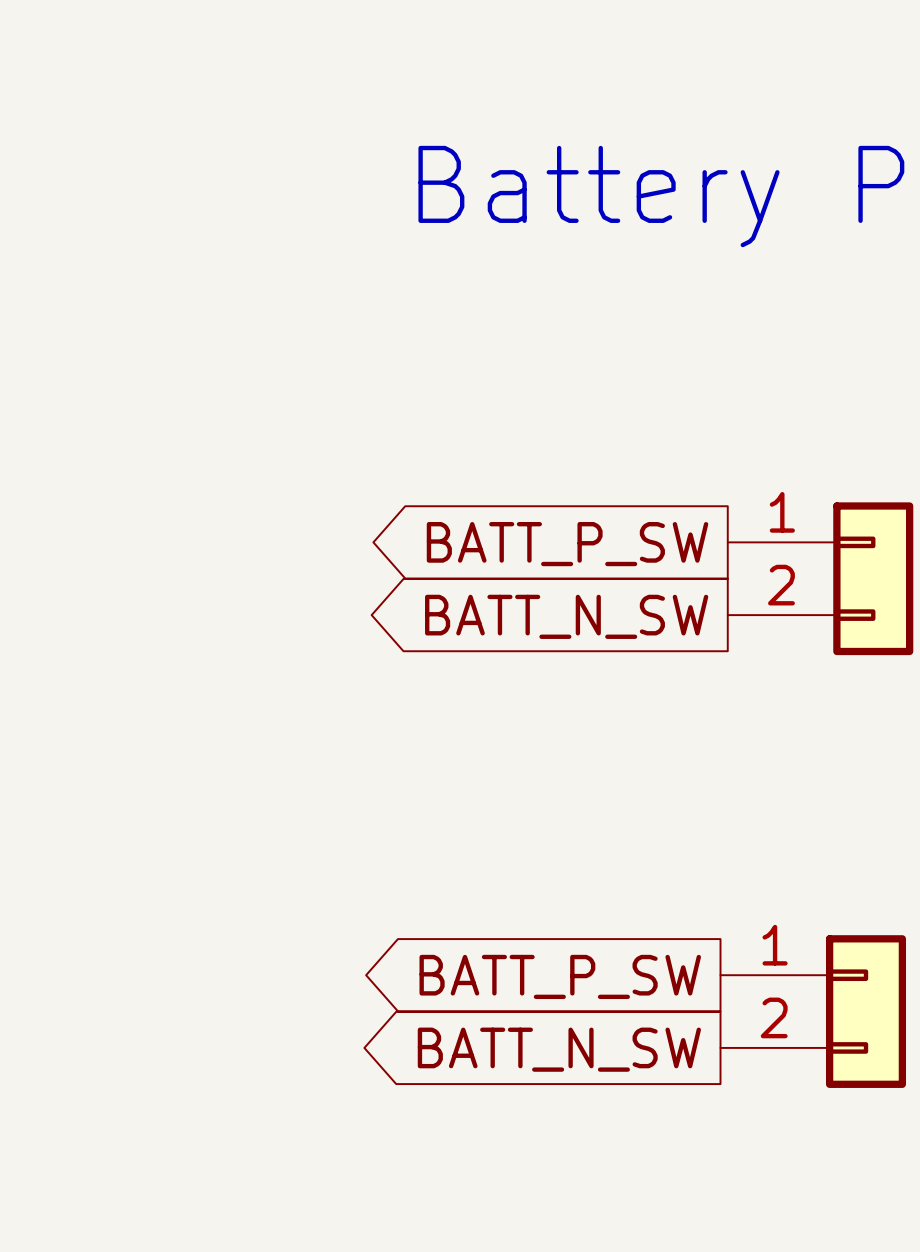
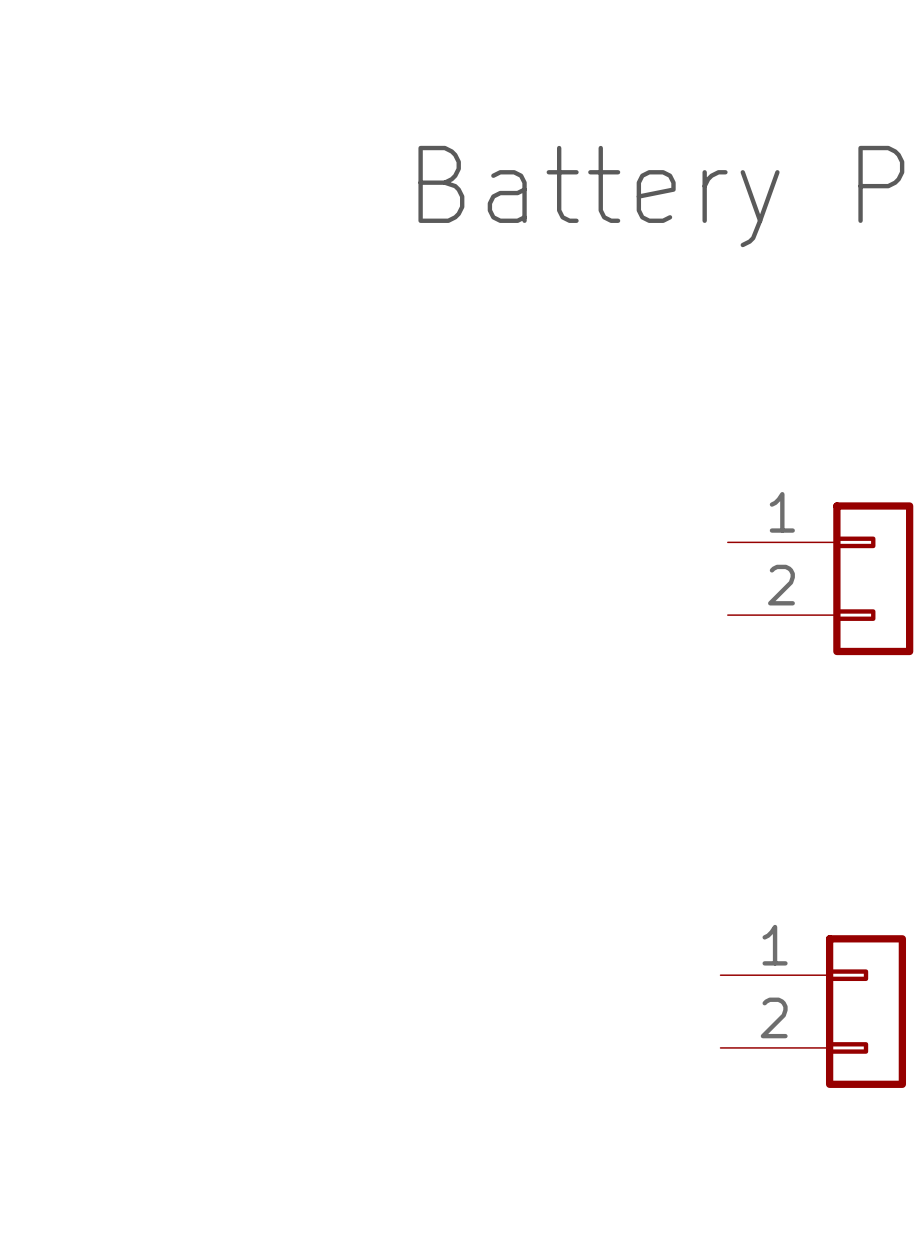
global label: BATT_P_SW (567, 544) -> none
global label: BATT_N_SW (566, 616) -> none
global label: BATT_P_SW (560, 976) -> none
global label: BATT_N_SW (559, 1049) -> none

